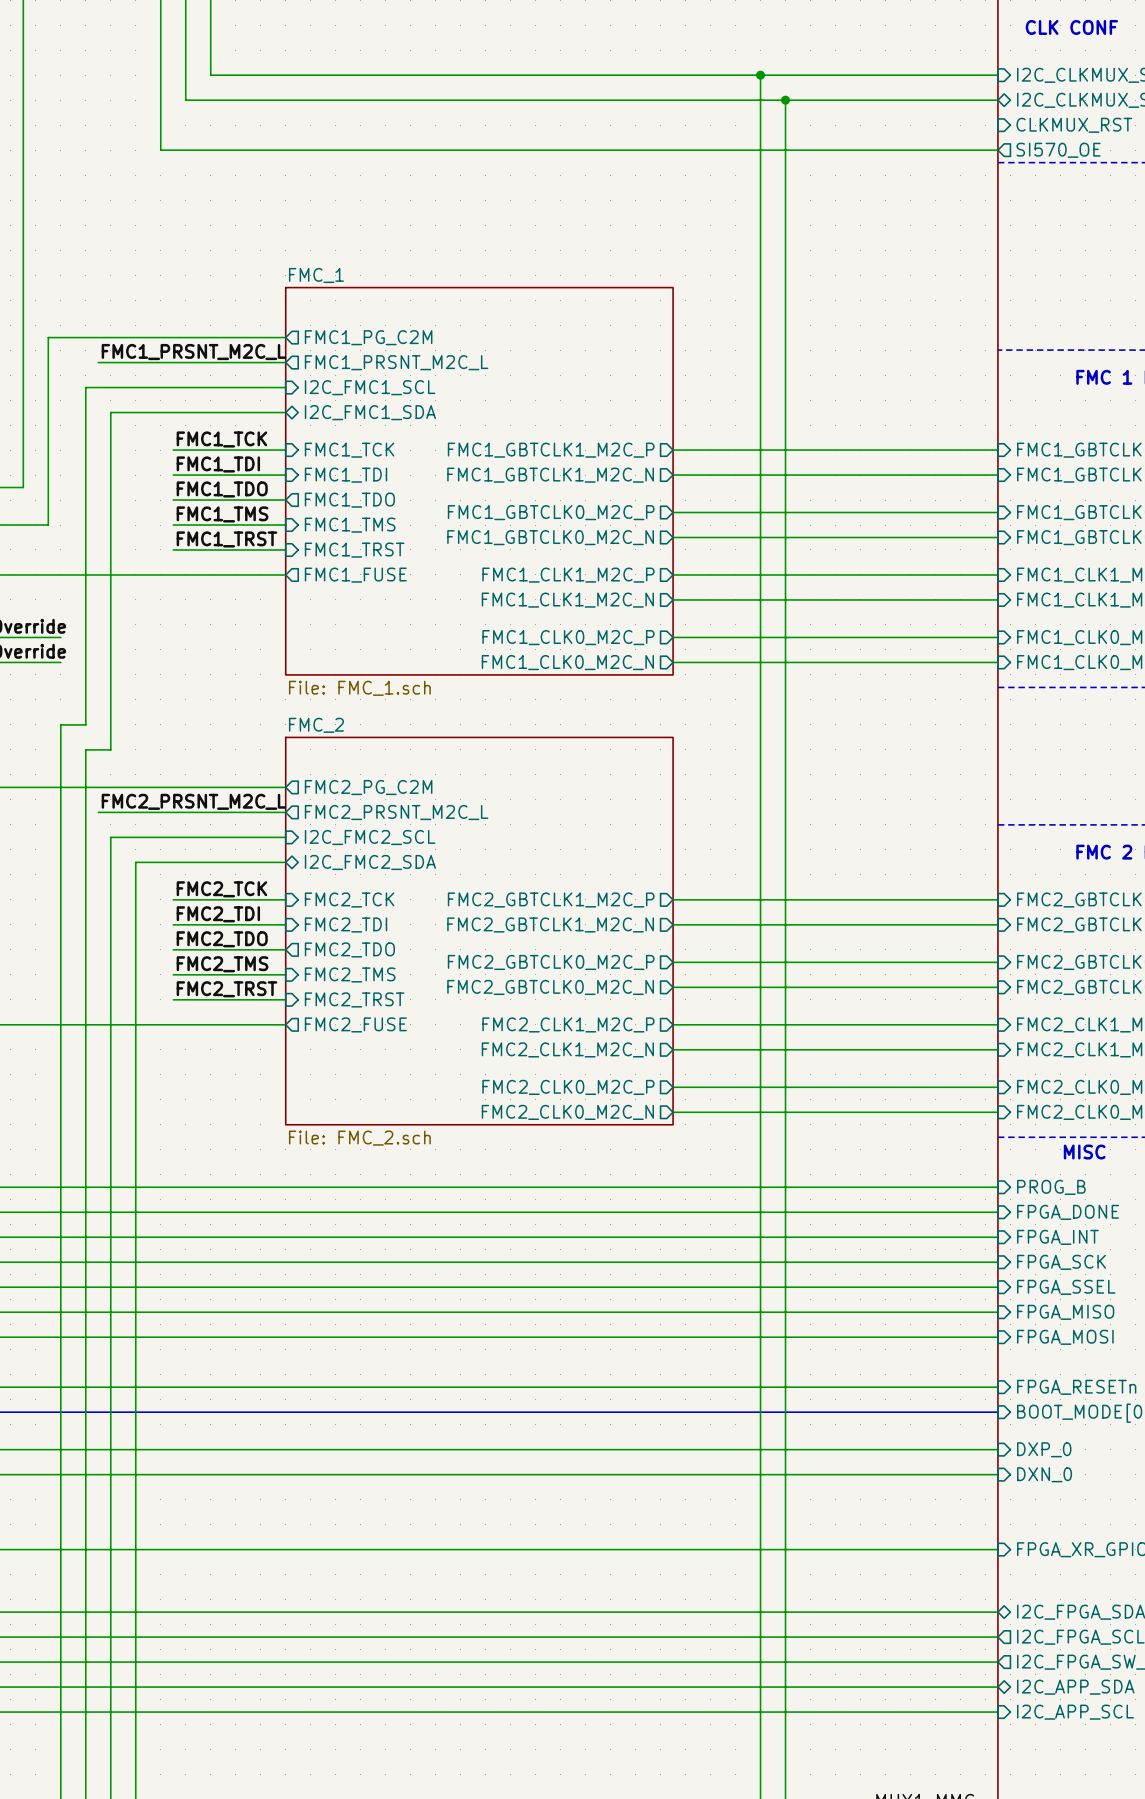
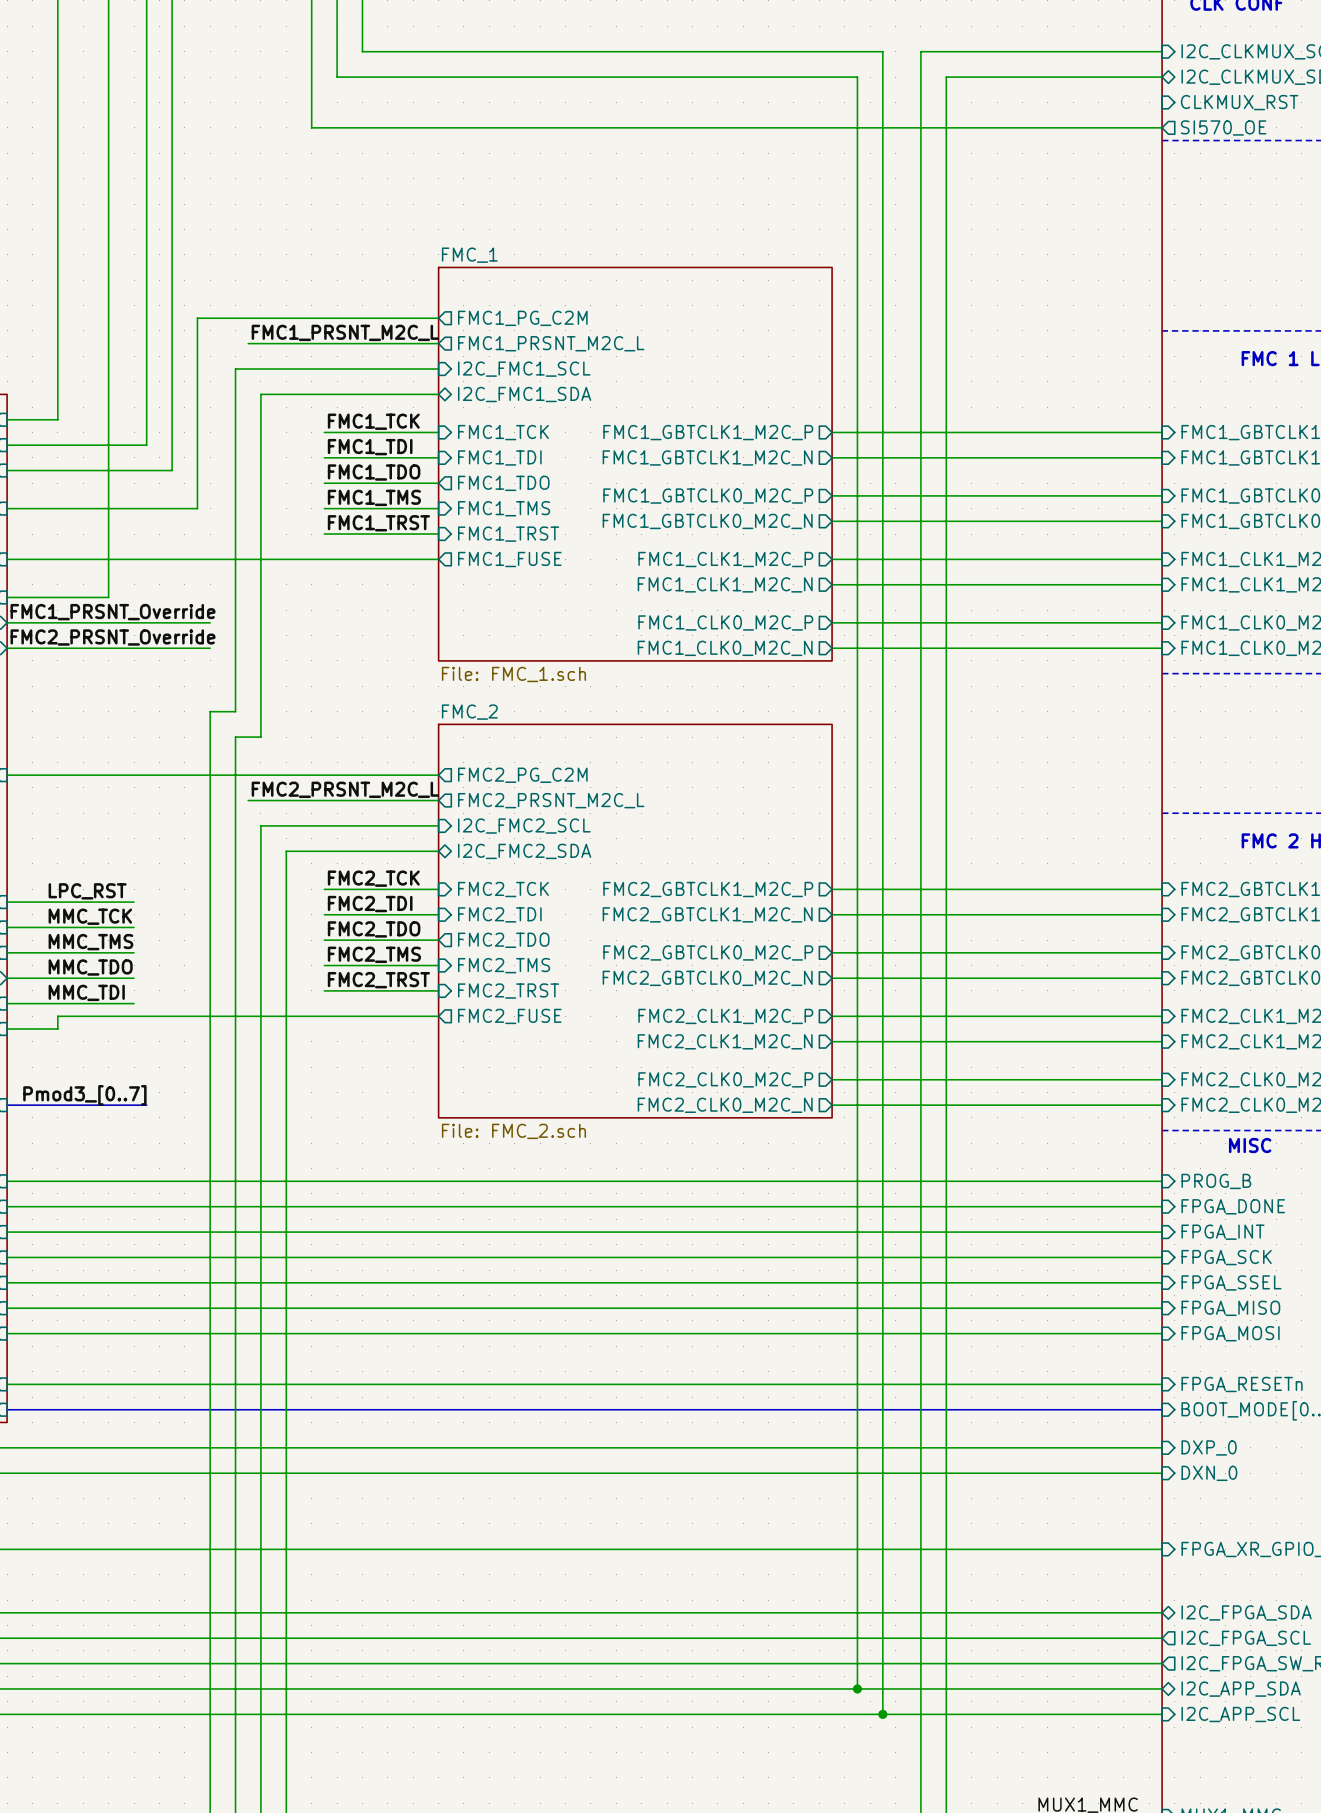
wire: (723, 75) (760, 75) -> (882, 51) (882, 1714)
junction: (760, 75) -> none
wire: (698, 100) (785, 100) -> (857, 77) (857, 1688)
junction: (785, 100) -> none
junction: none -> (857, 1688)
junction: none -> (882, 1714)

